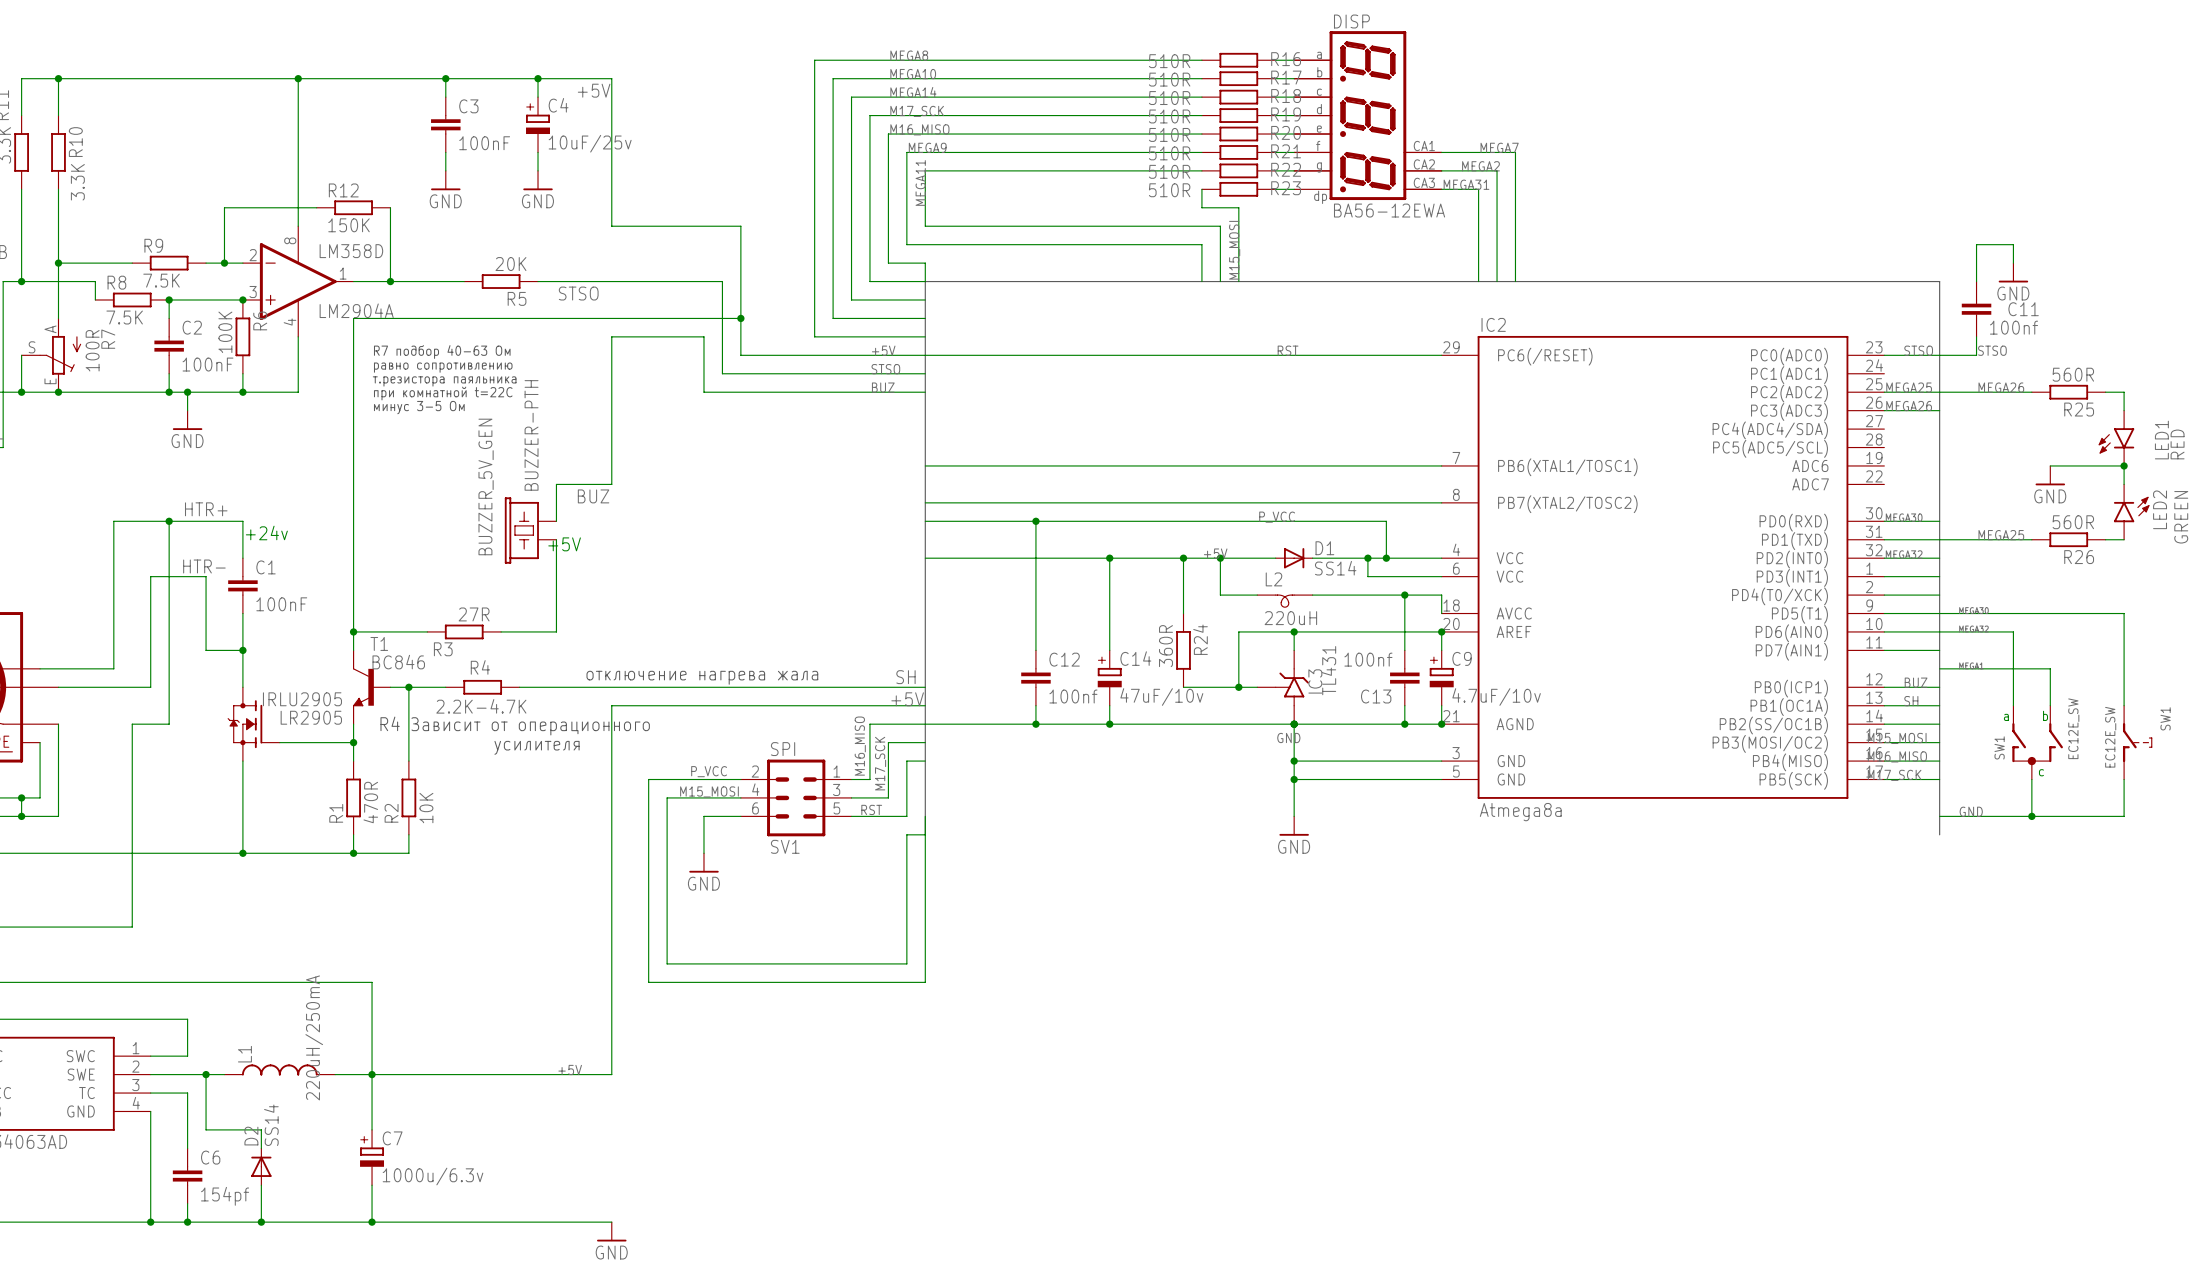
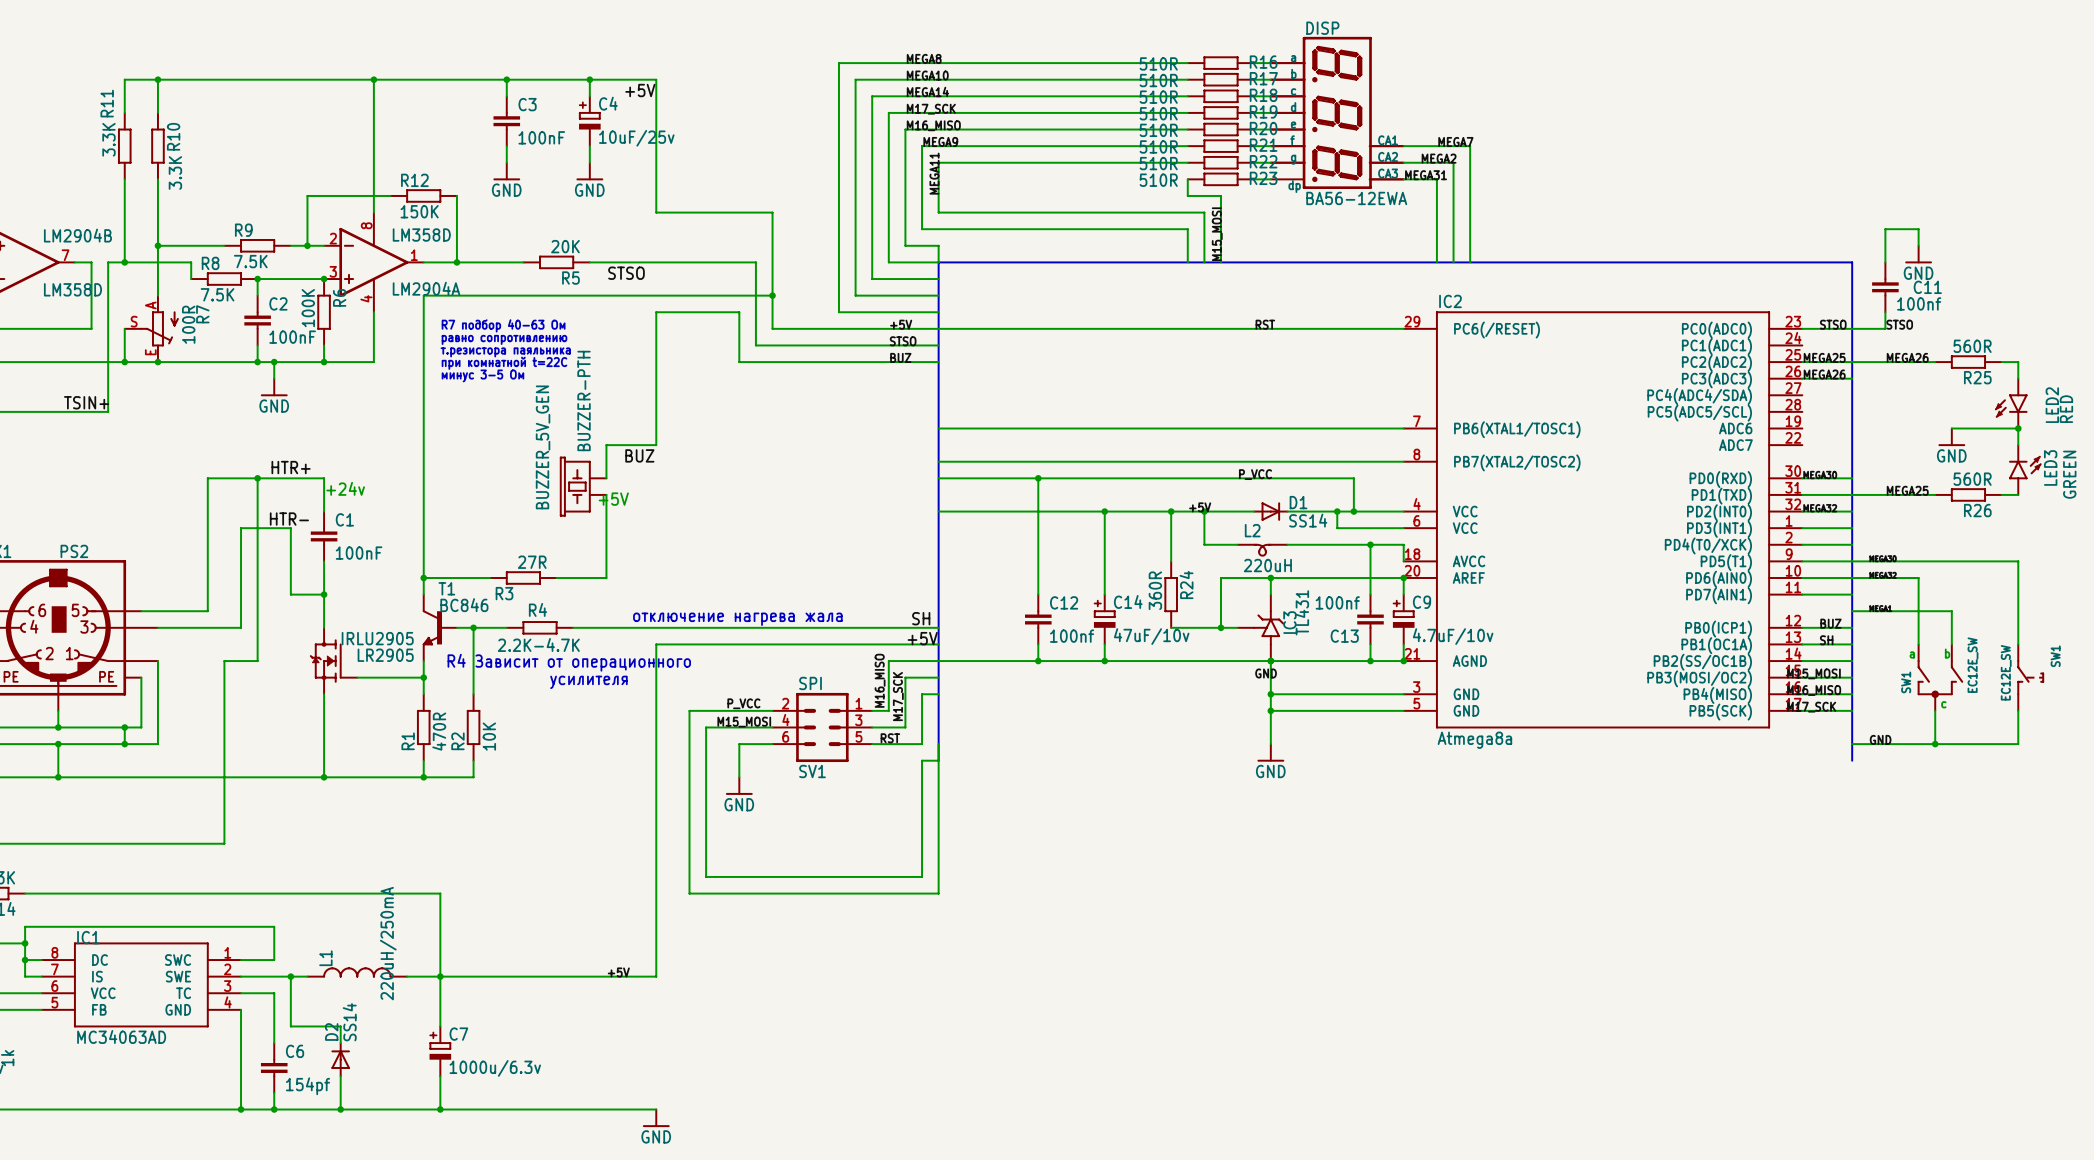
LED1 name: LED1 (2161, 440) -> LED2 (2052, 405)
LED2 name: LED2 (2160, 509) -> LED3 (2050, 467)

